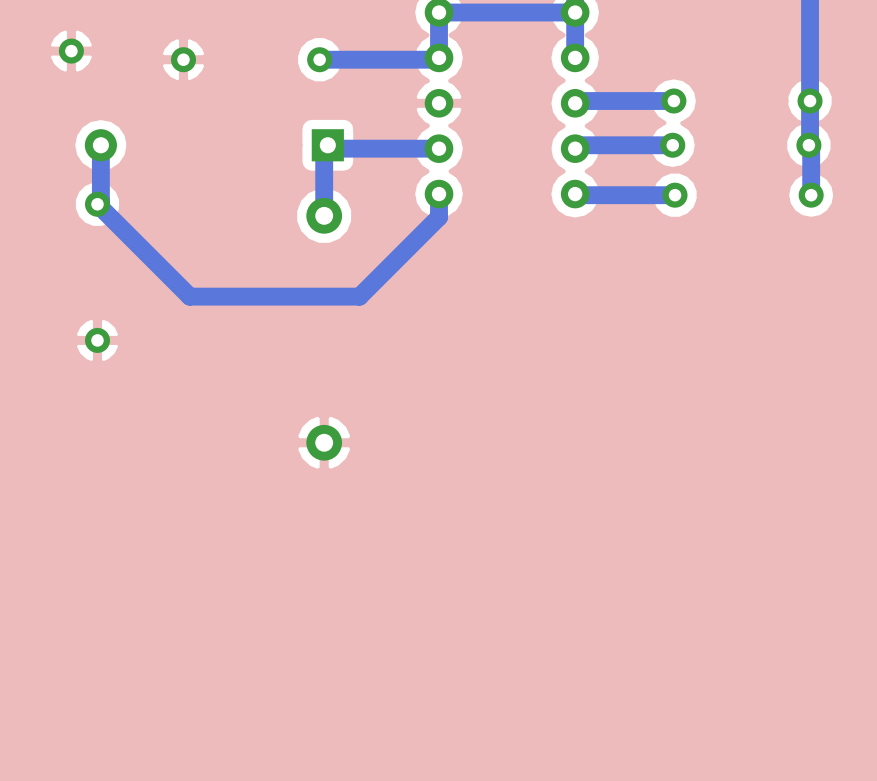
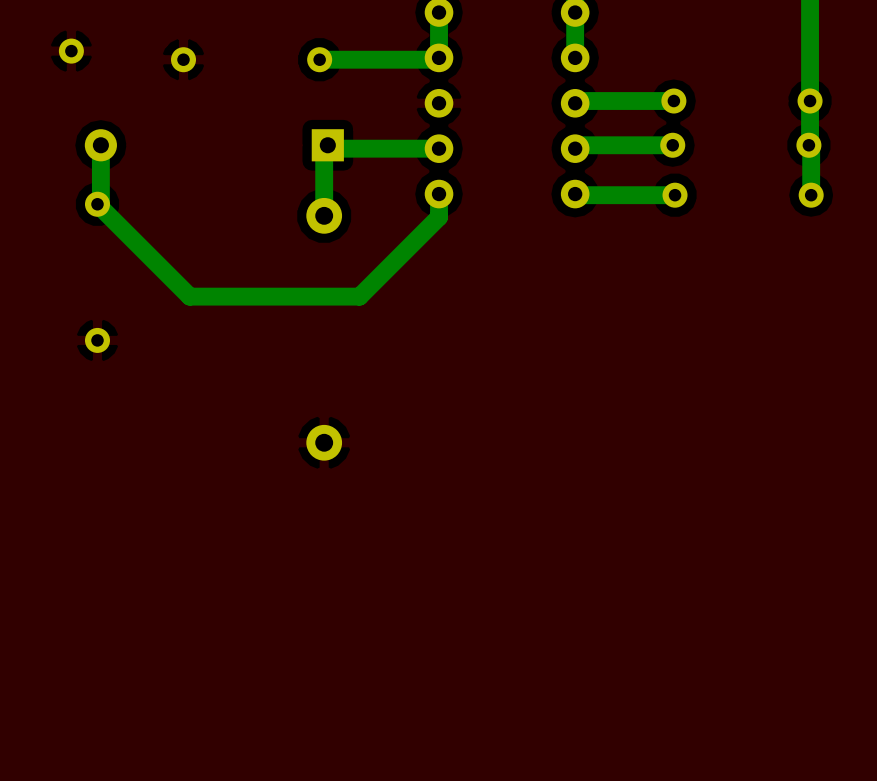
bottom track: (575, 12) (439, 12) -> none

